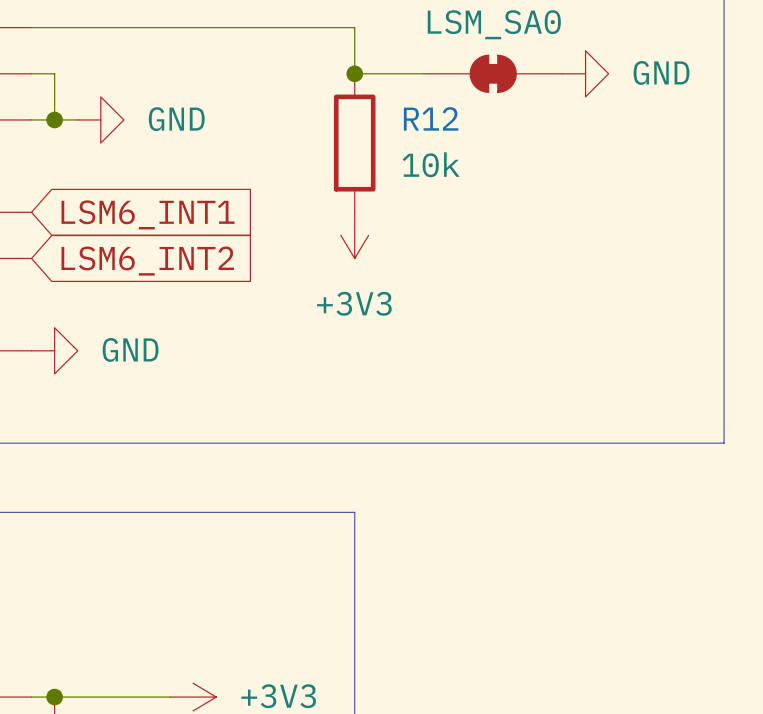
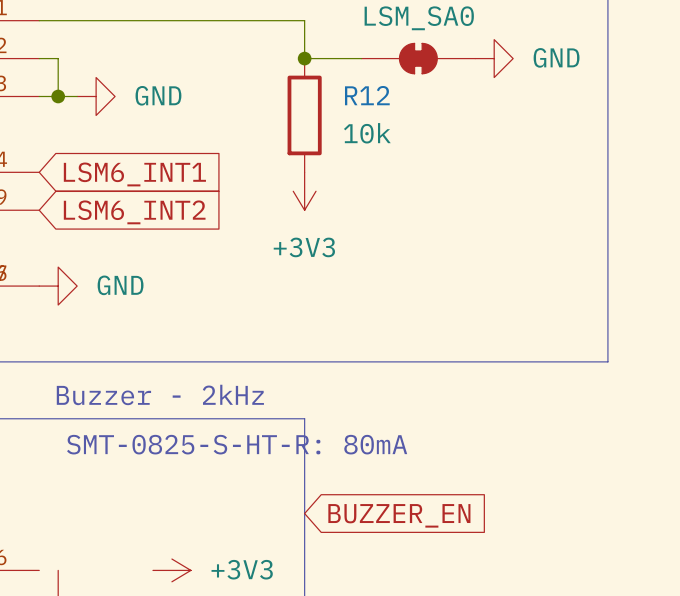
text: none -> Buzzer - 2kHz (160, 394)
text: none -> SMT-0825-S-HT-R: 80mA (237, 444)
global label: none -> BUZZER_EN (399, 515)
wire: (31, 697) (170, 697) -> none
junction: (54, 697) -> none

